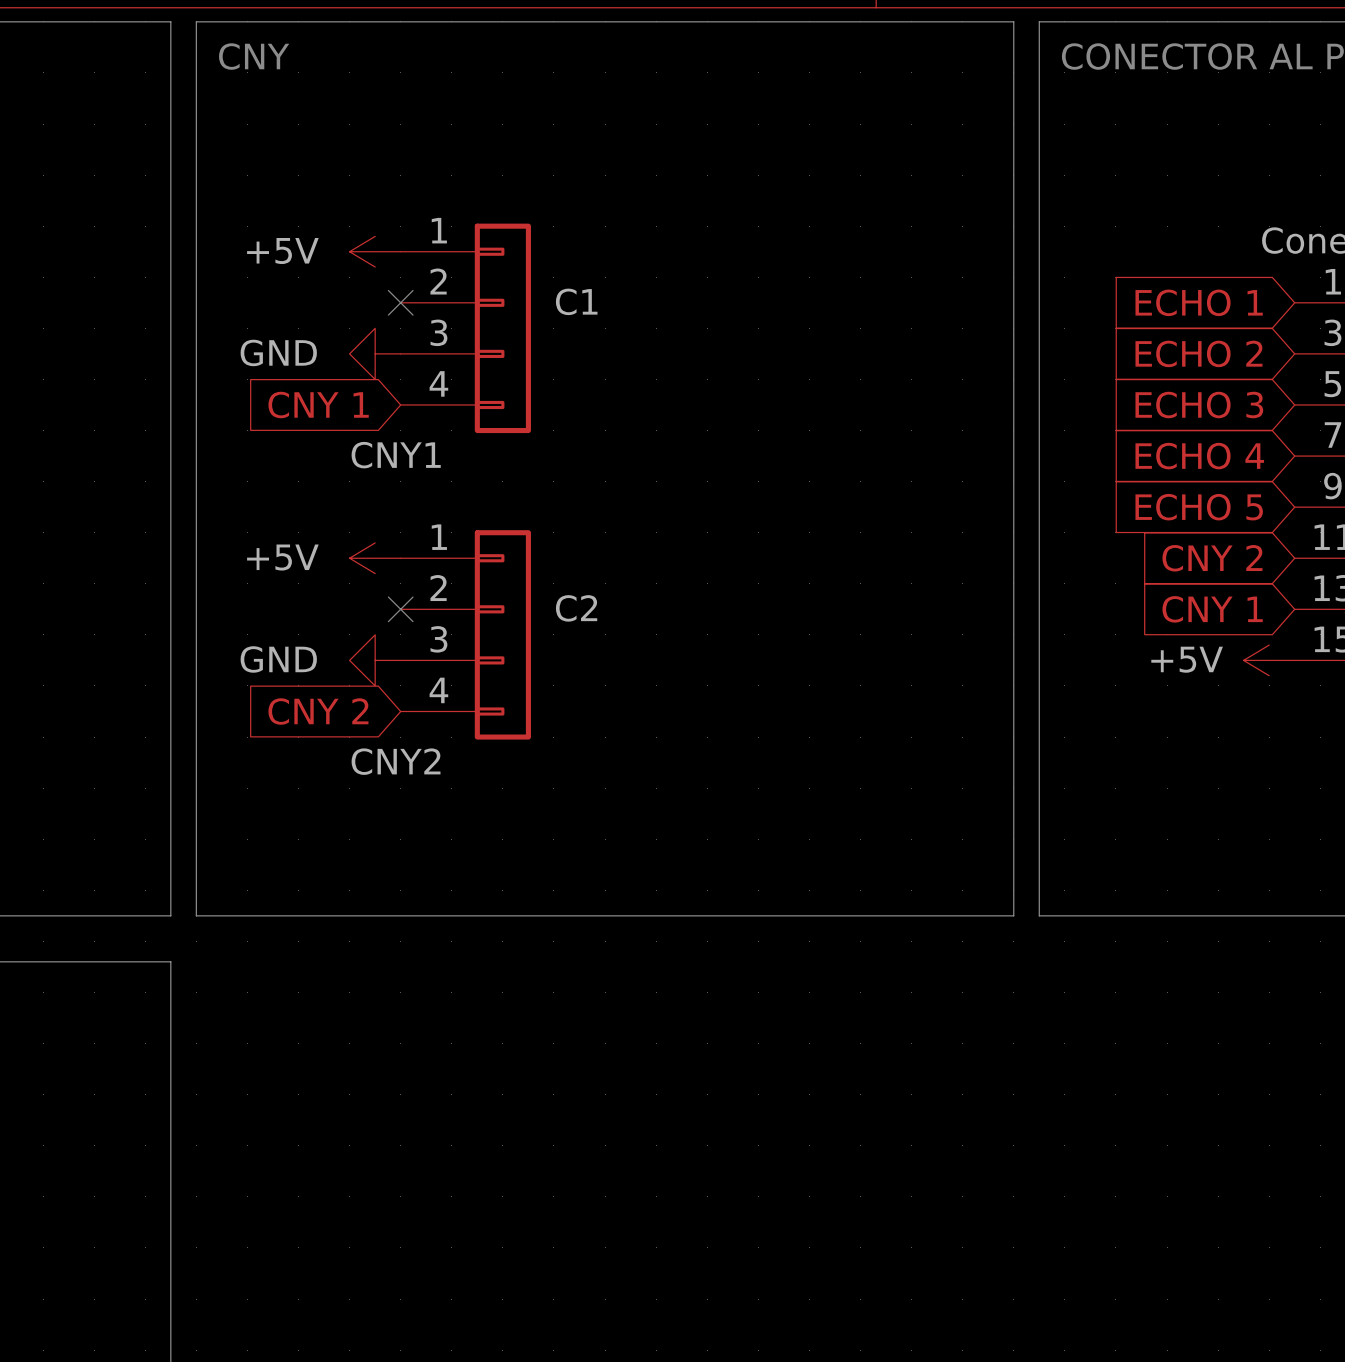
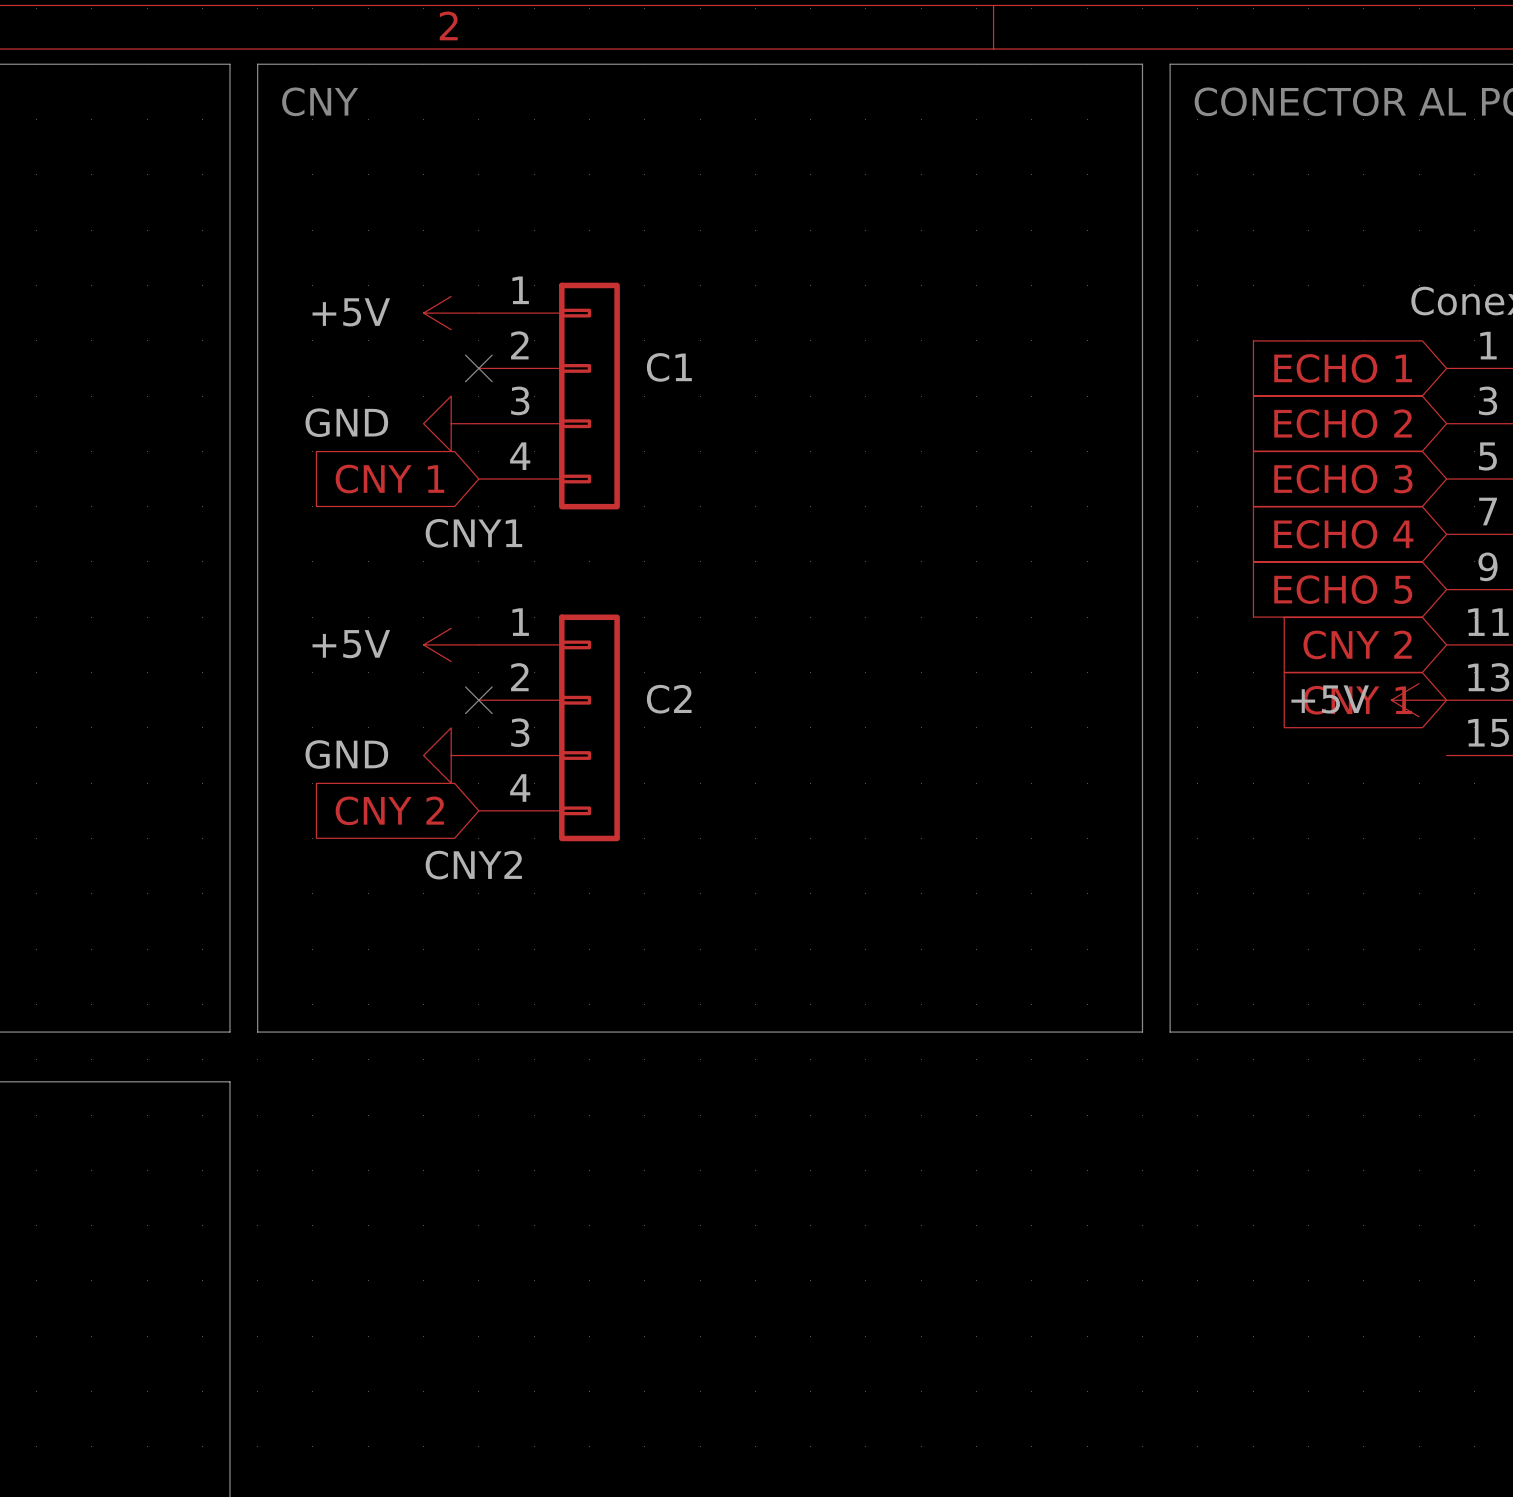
power symbol position: +5V (1269, 660) -> +5V (1419, 700)

